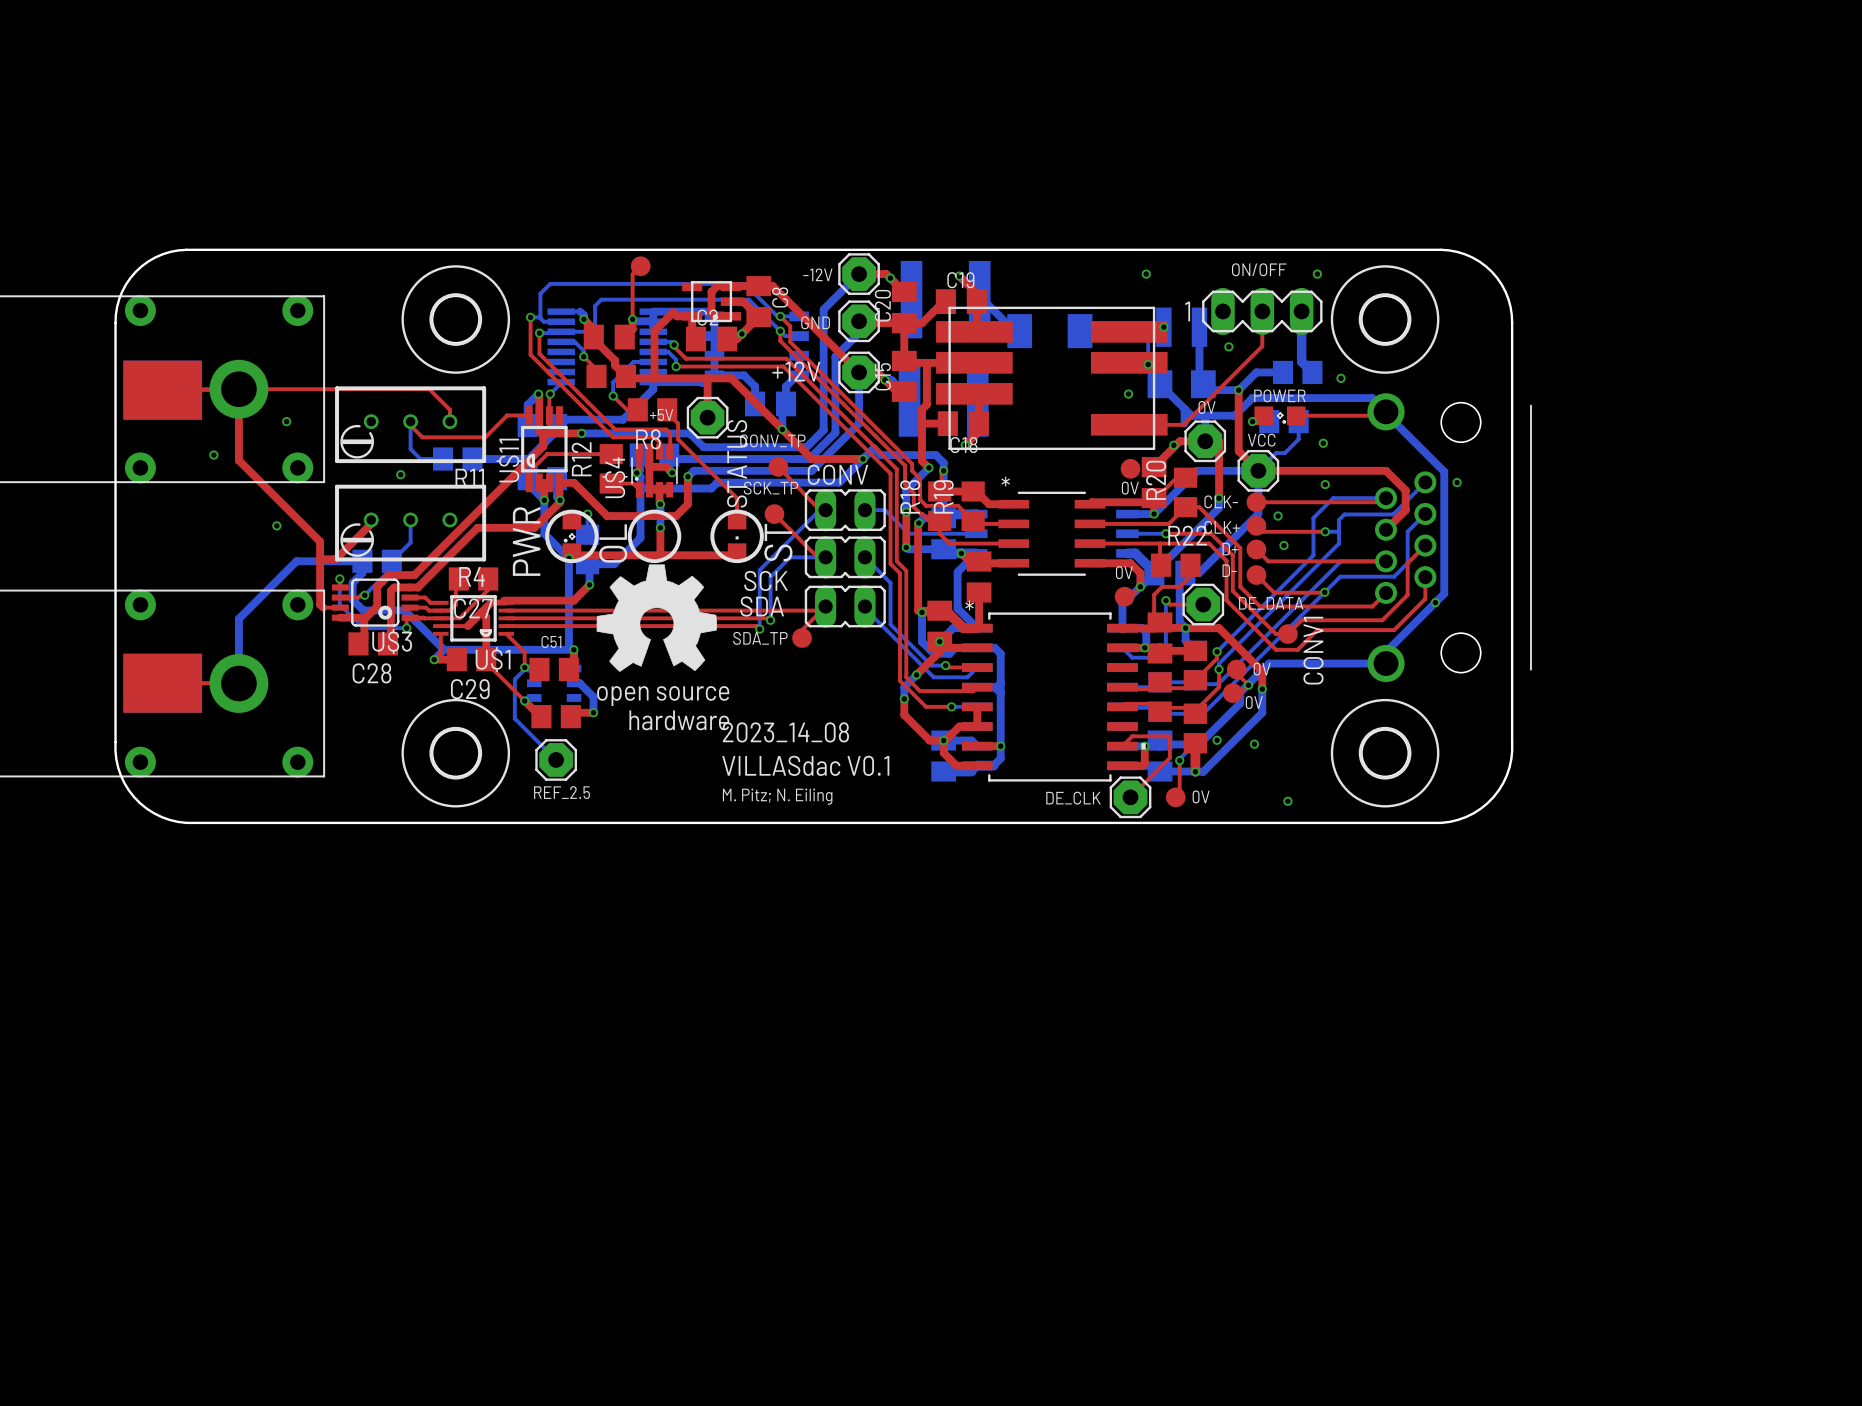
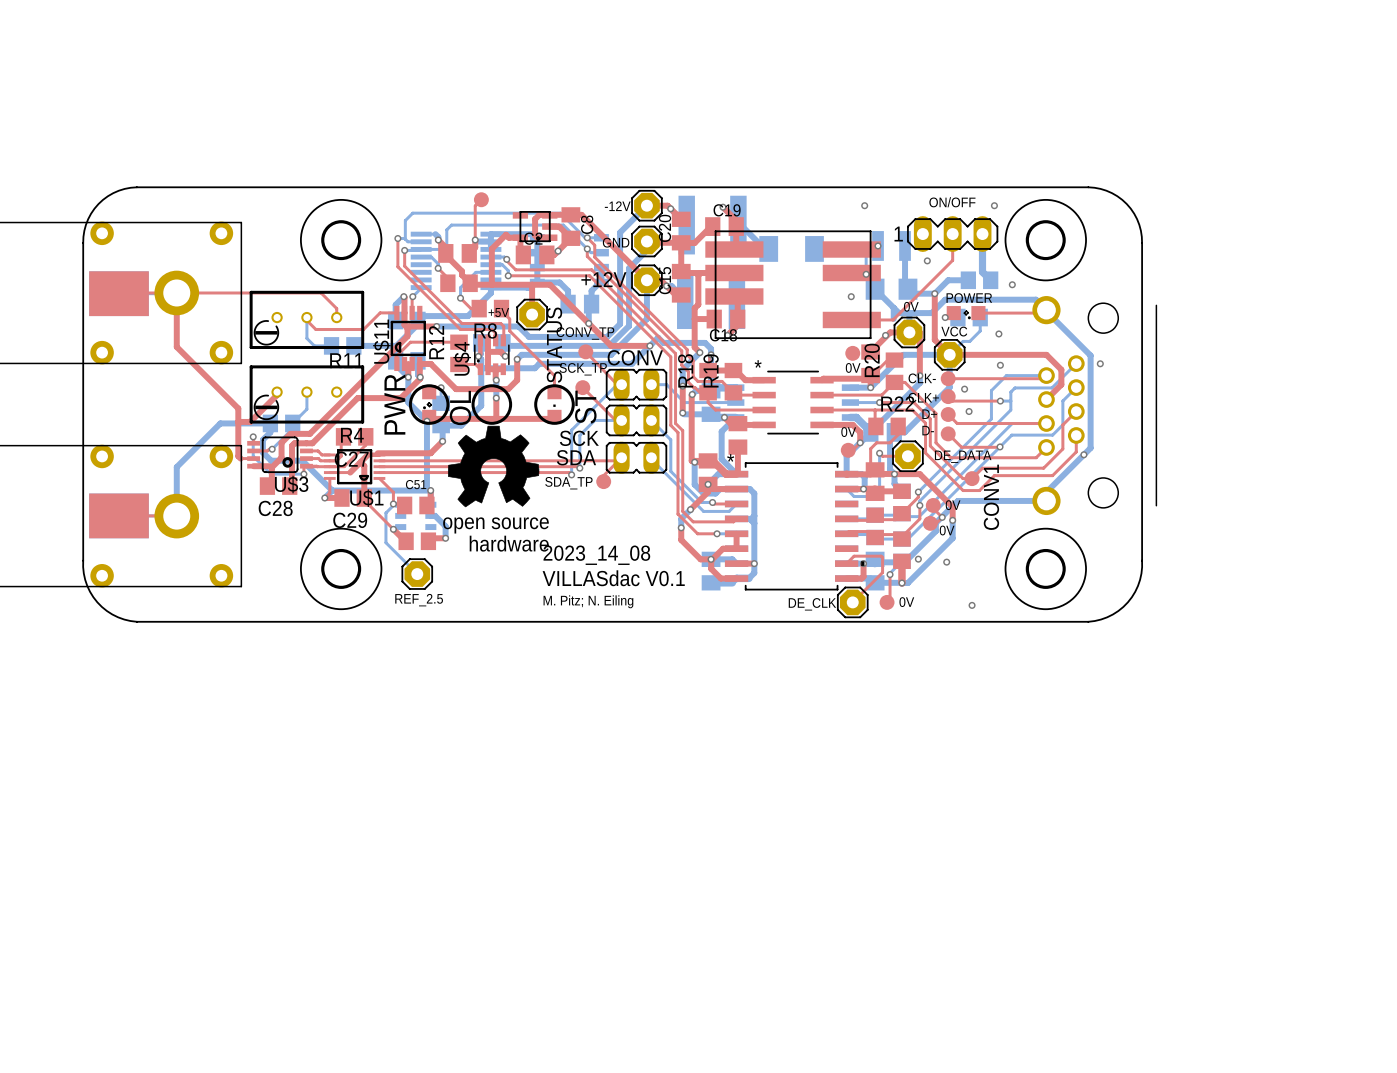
via: (286, 421) -> none
via: (213, 455) -> none
via: (400, 474) -> none
via: (276, 525) -> none

